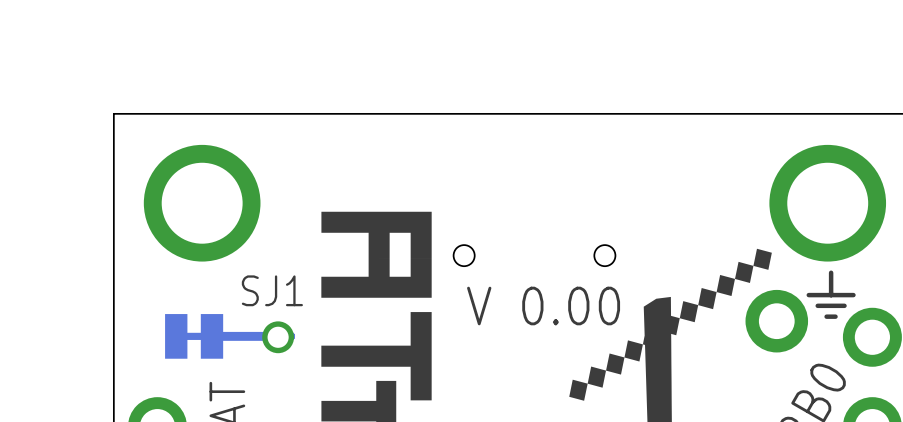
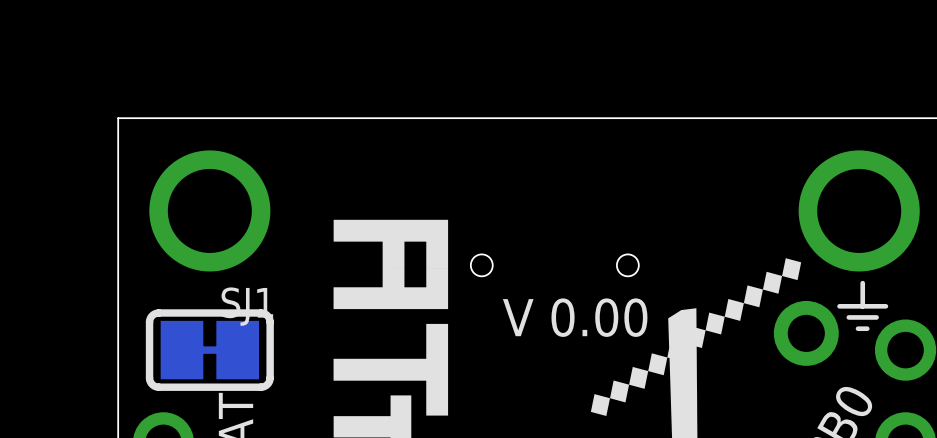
SJ1 footprint: [165, 314, 224, 359] -> [145, 309, 274, 391]
track: (211, 336) (290, 336) (284, 339) (278, 337) -> none
via: (278, 337) -> none

